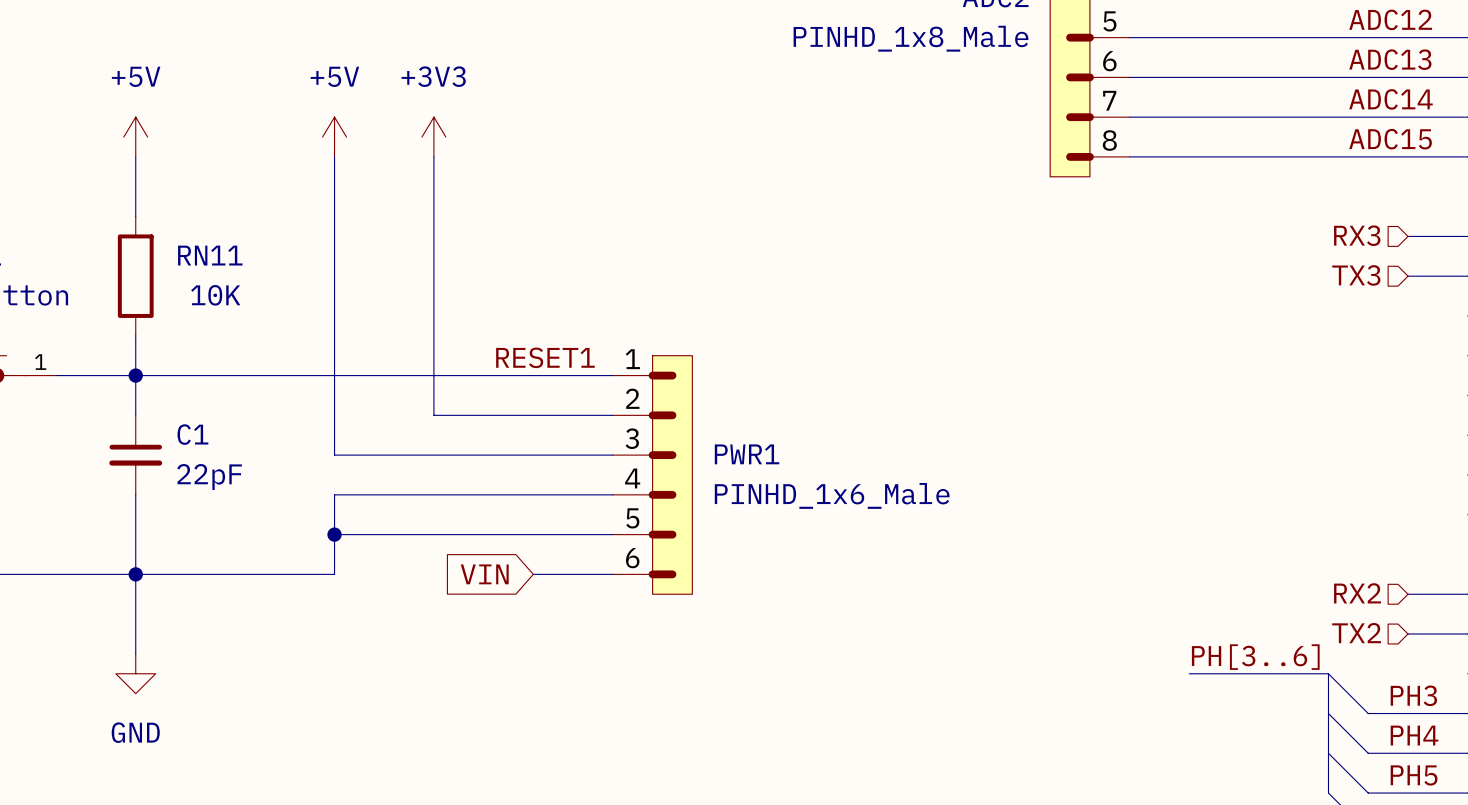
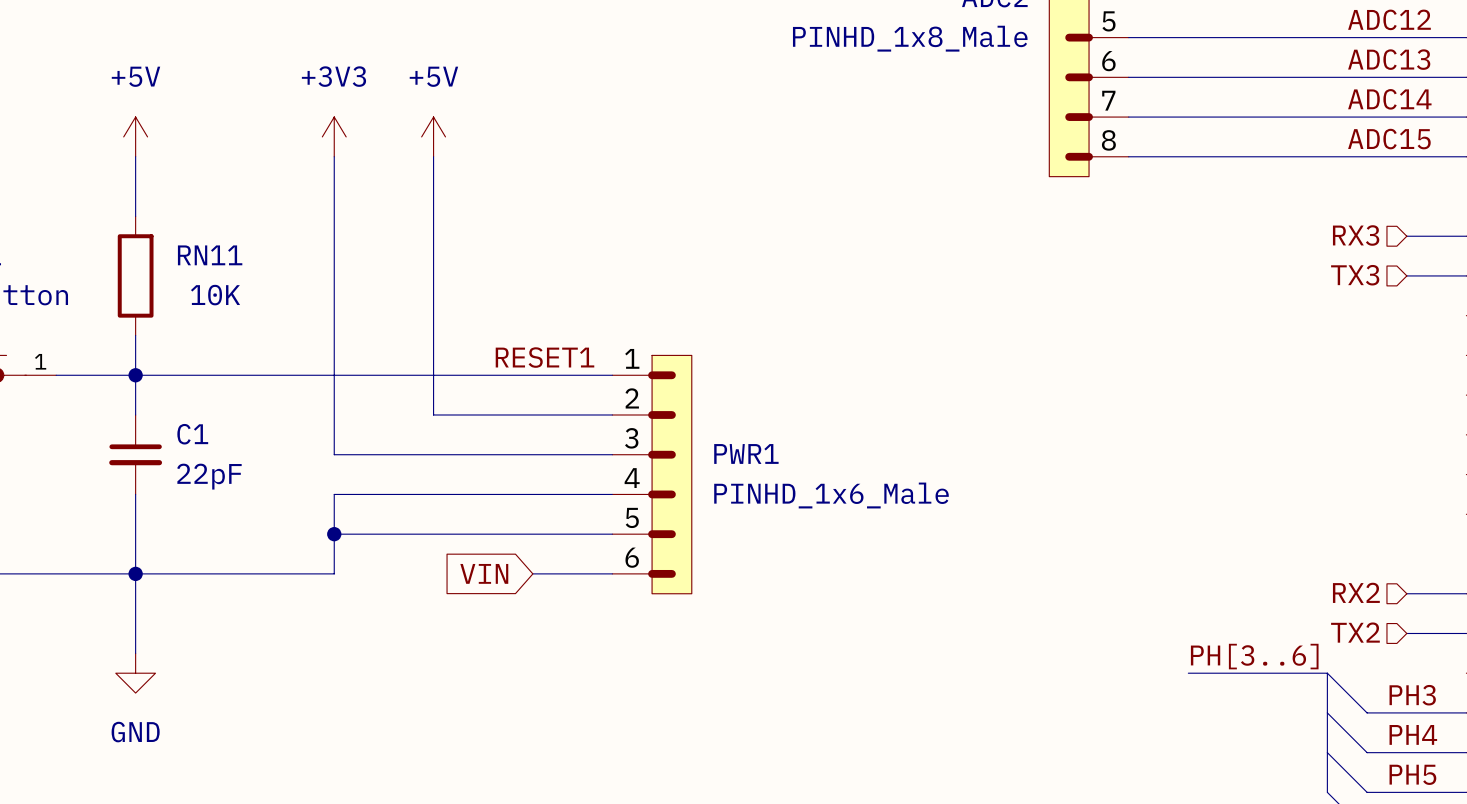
power symbol: +5V (334, 137) -> +3V3 (334, 136)
power symbol: +3V3 (433, 137) -> +5V (433, 136)

